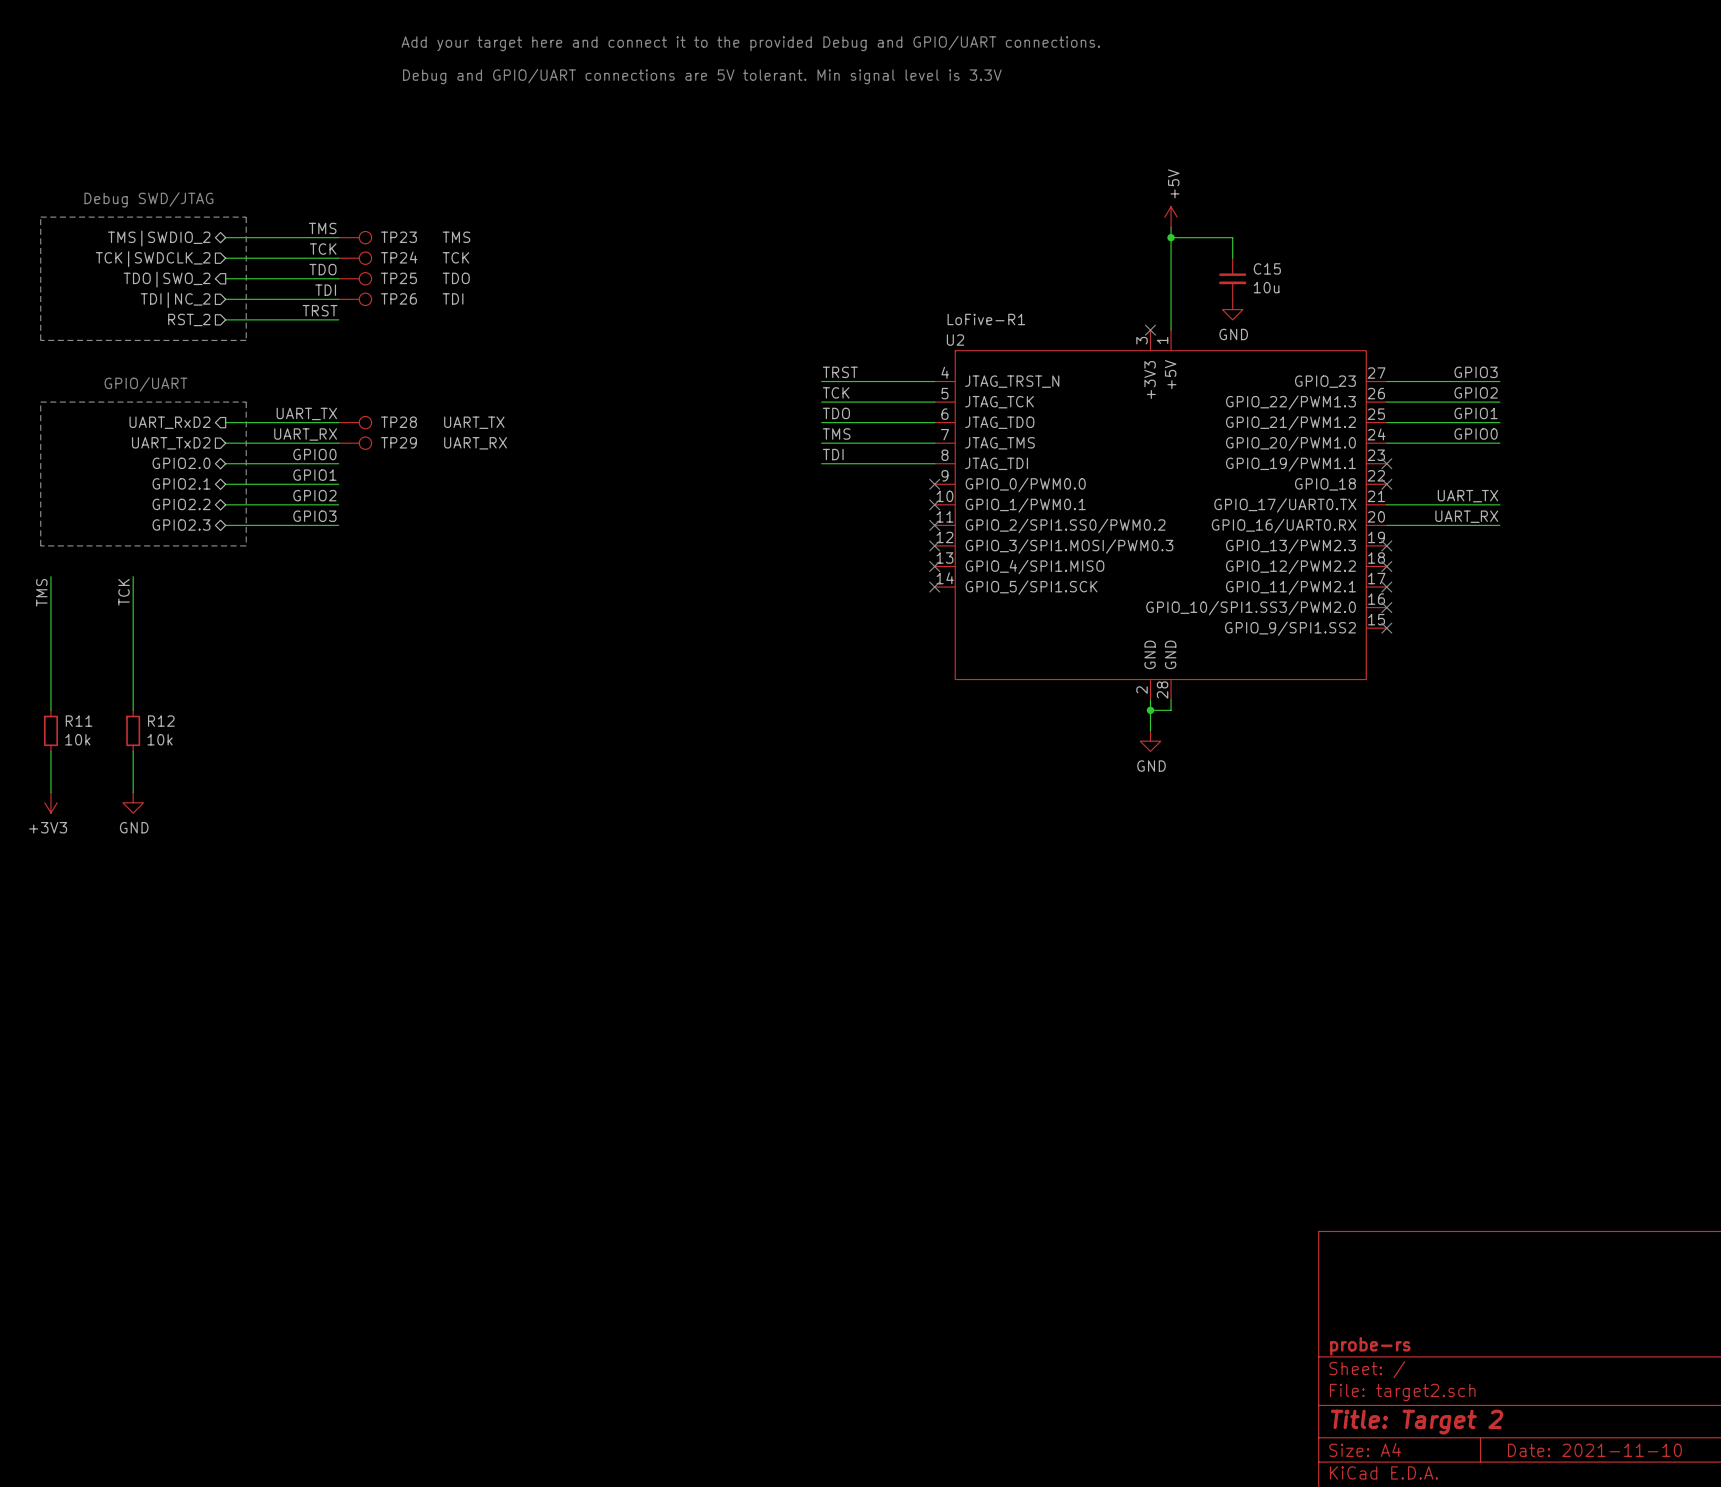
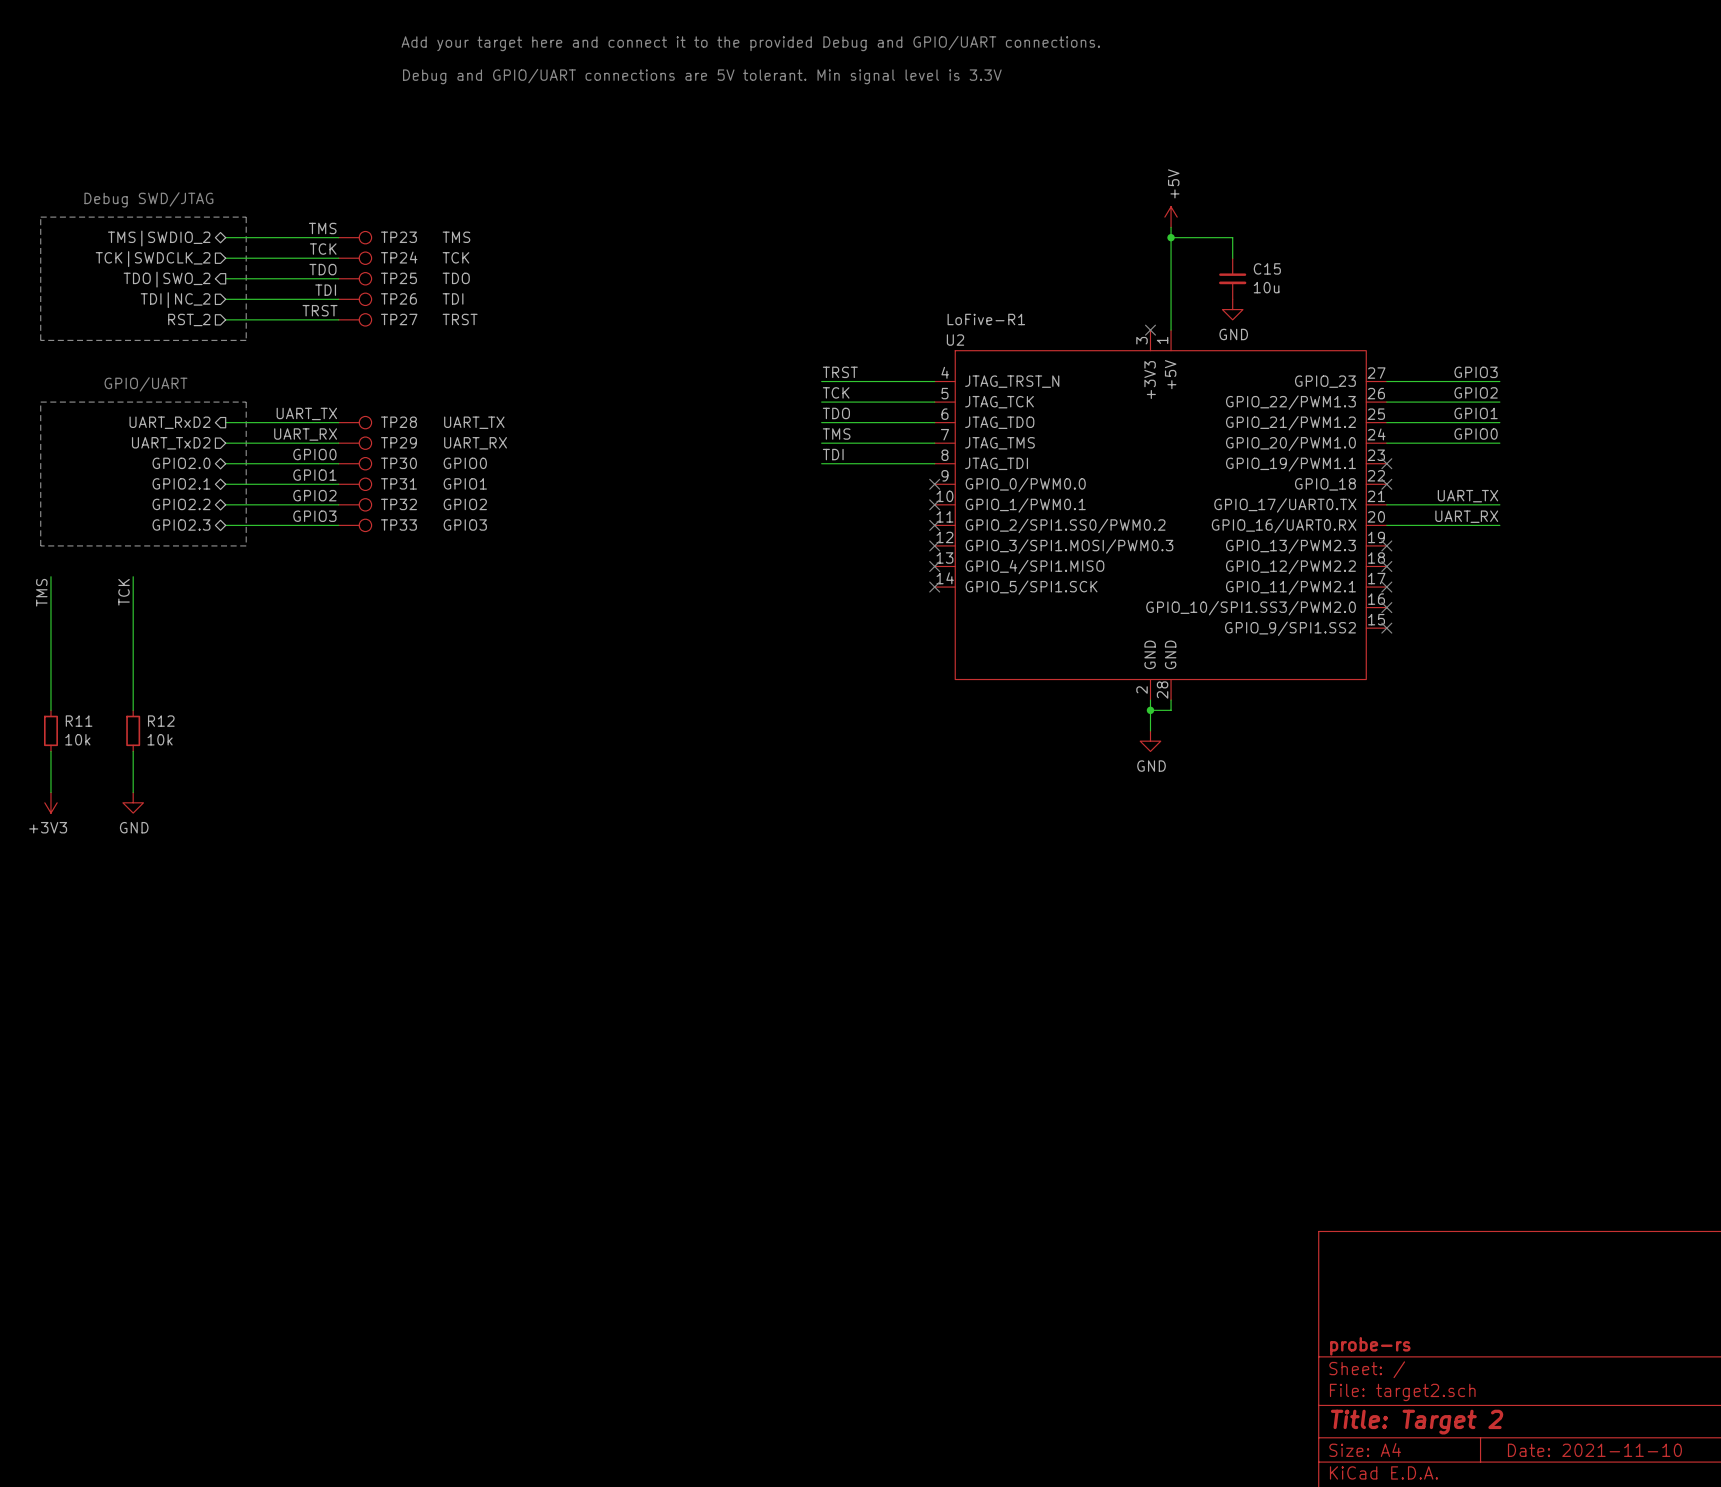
TP27: none -> TRST (355, 319)
TP30: none -> GPIO0 (355, 463)
TP31: none -> GPIO1 (355, 484)
TP32: none -> GPIO2 (355, 504)
TP33: none -> GPIO3 (355, 525)

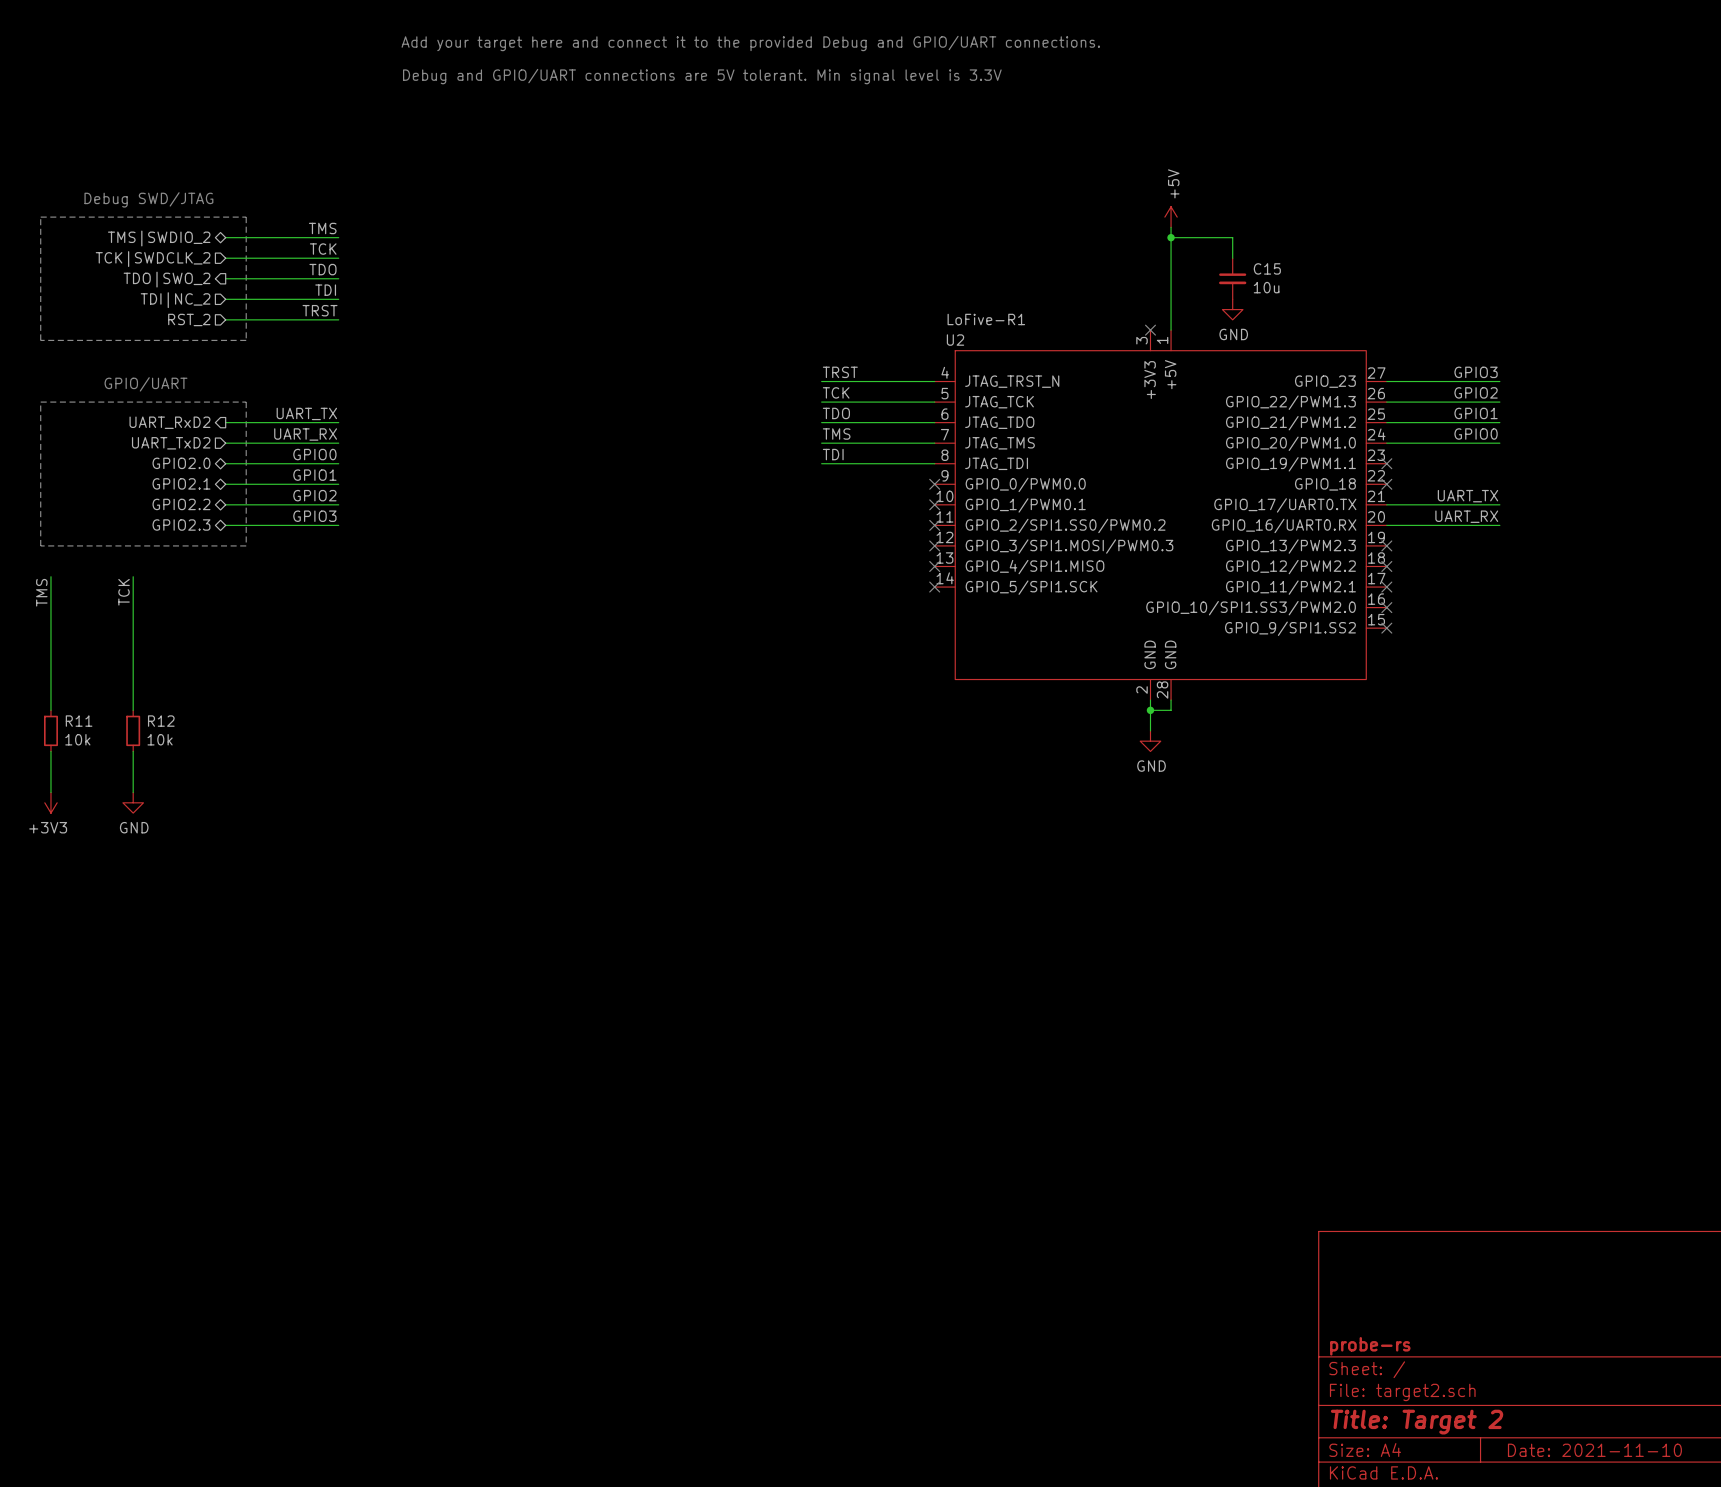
TP23: TMS (355, 237) -> none
TP24: TCK (355, 258) -> none
TP25: TDO (355, 278) -> none
TP26: TDI (355, 299) -> none
TP27: TRST (355, 319) -> none
TP28: UART_TX (355, 422) -> none
TP29: UART_RX (355, 443) -> none
TP30: GPIO0 (355, 463) -> none
TP31: GPIO1 (355, 484) -> none
TP32: GPIO2 (355, 504) -> none
TP33: GPIO3 (355, 525) -> none

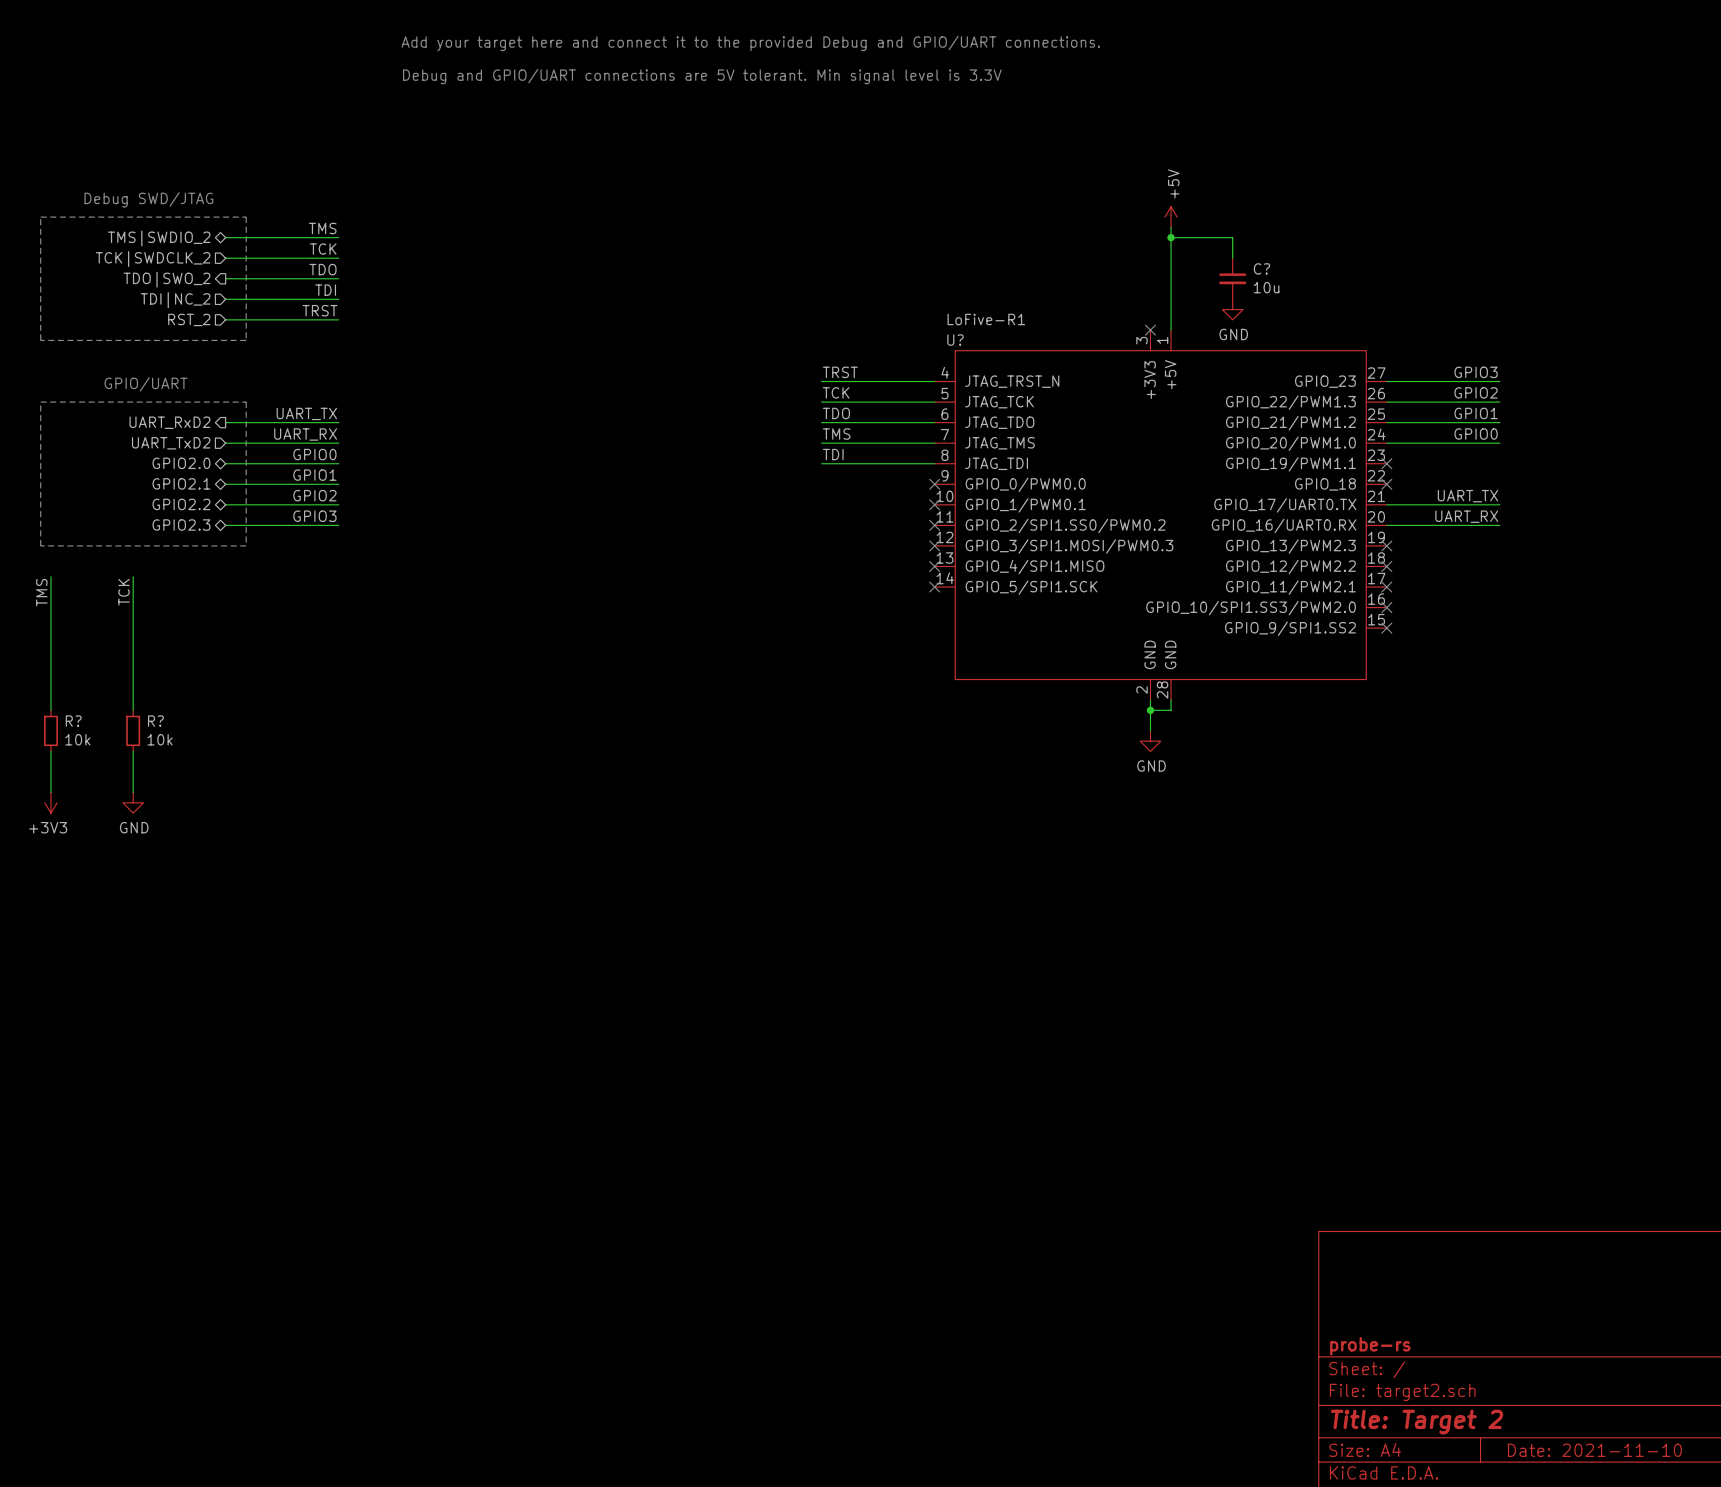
C15 name: C15 (1267, 268) -> C? (1261, 268)
U2 name: U2 (955, 340) -> U? (955, 340)
R11 name: R11 (79, 721) -> R? (73, 721)
R12 name: R12 (161, 721) -> R? (155, 721)

